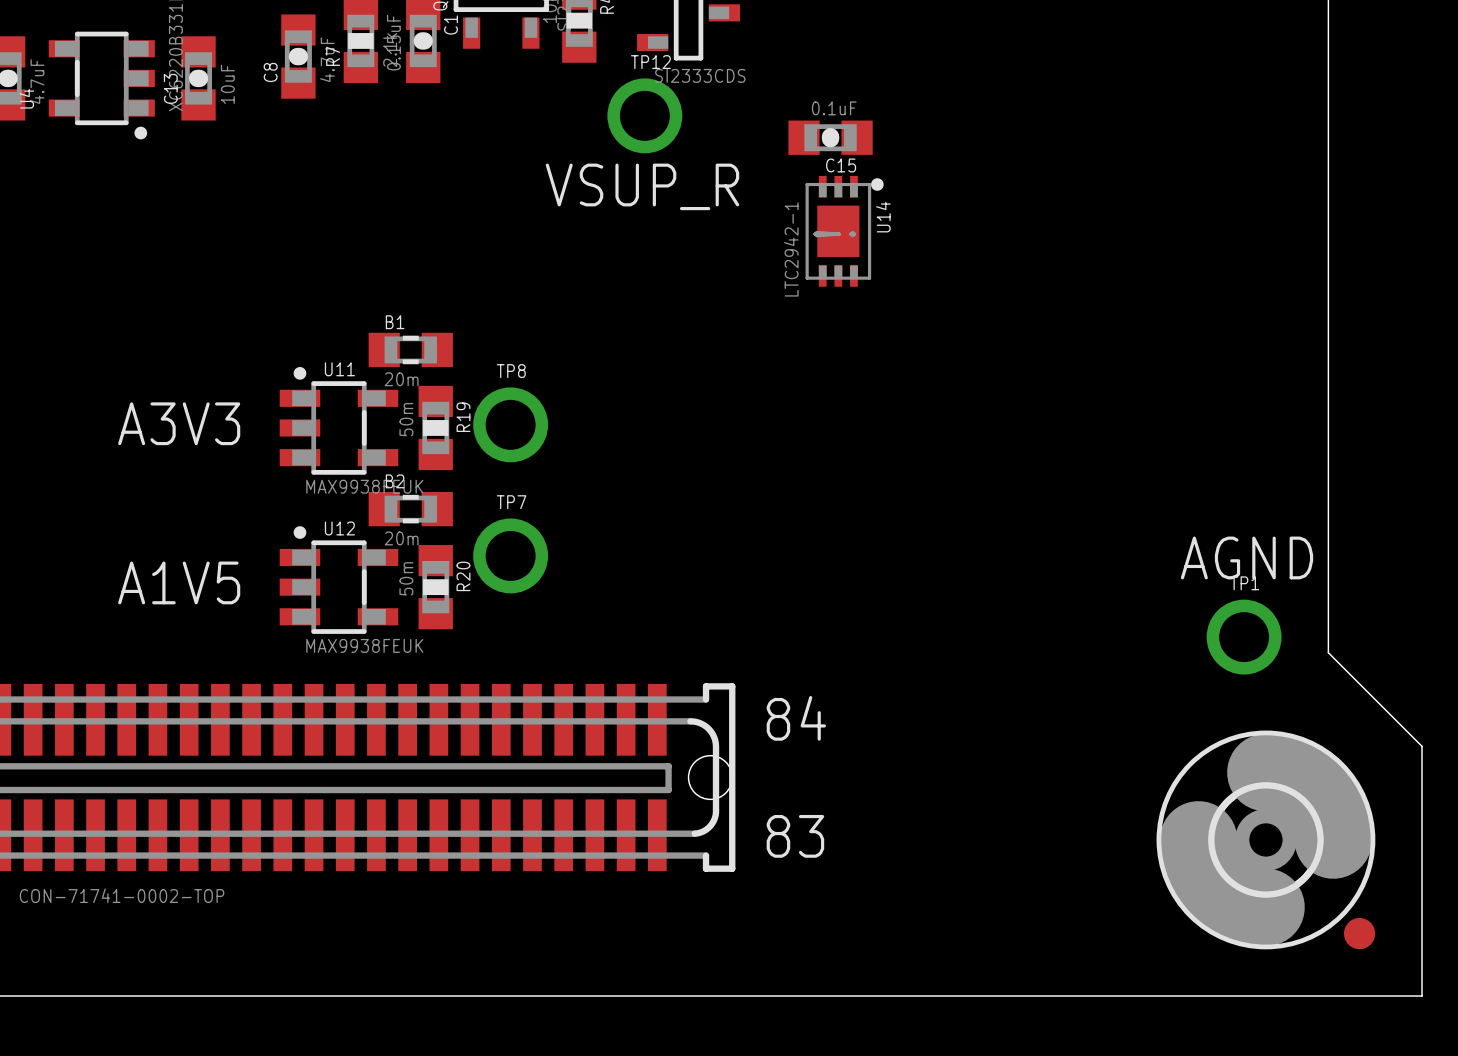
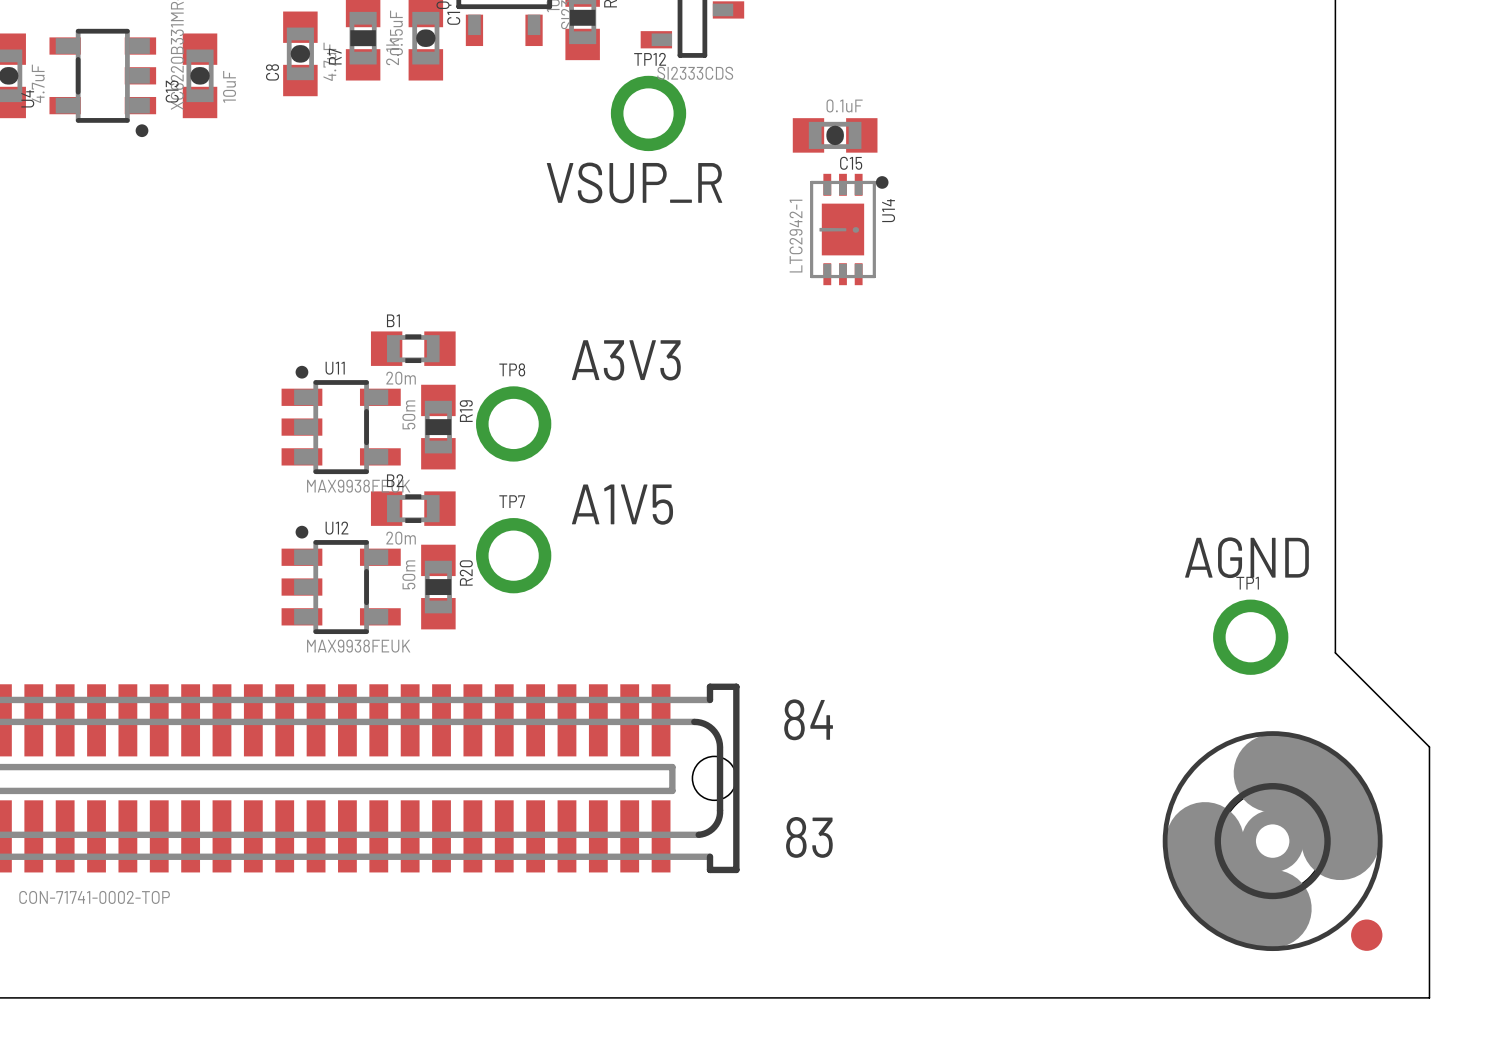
text position: A3V3 (179, 423) -> A3V3 (626, 360)
text position: A1V5 (179, 582) -> A1V5 (622, 504)

